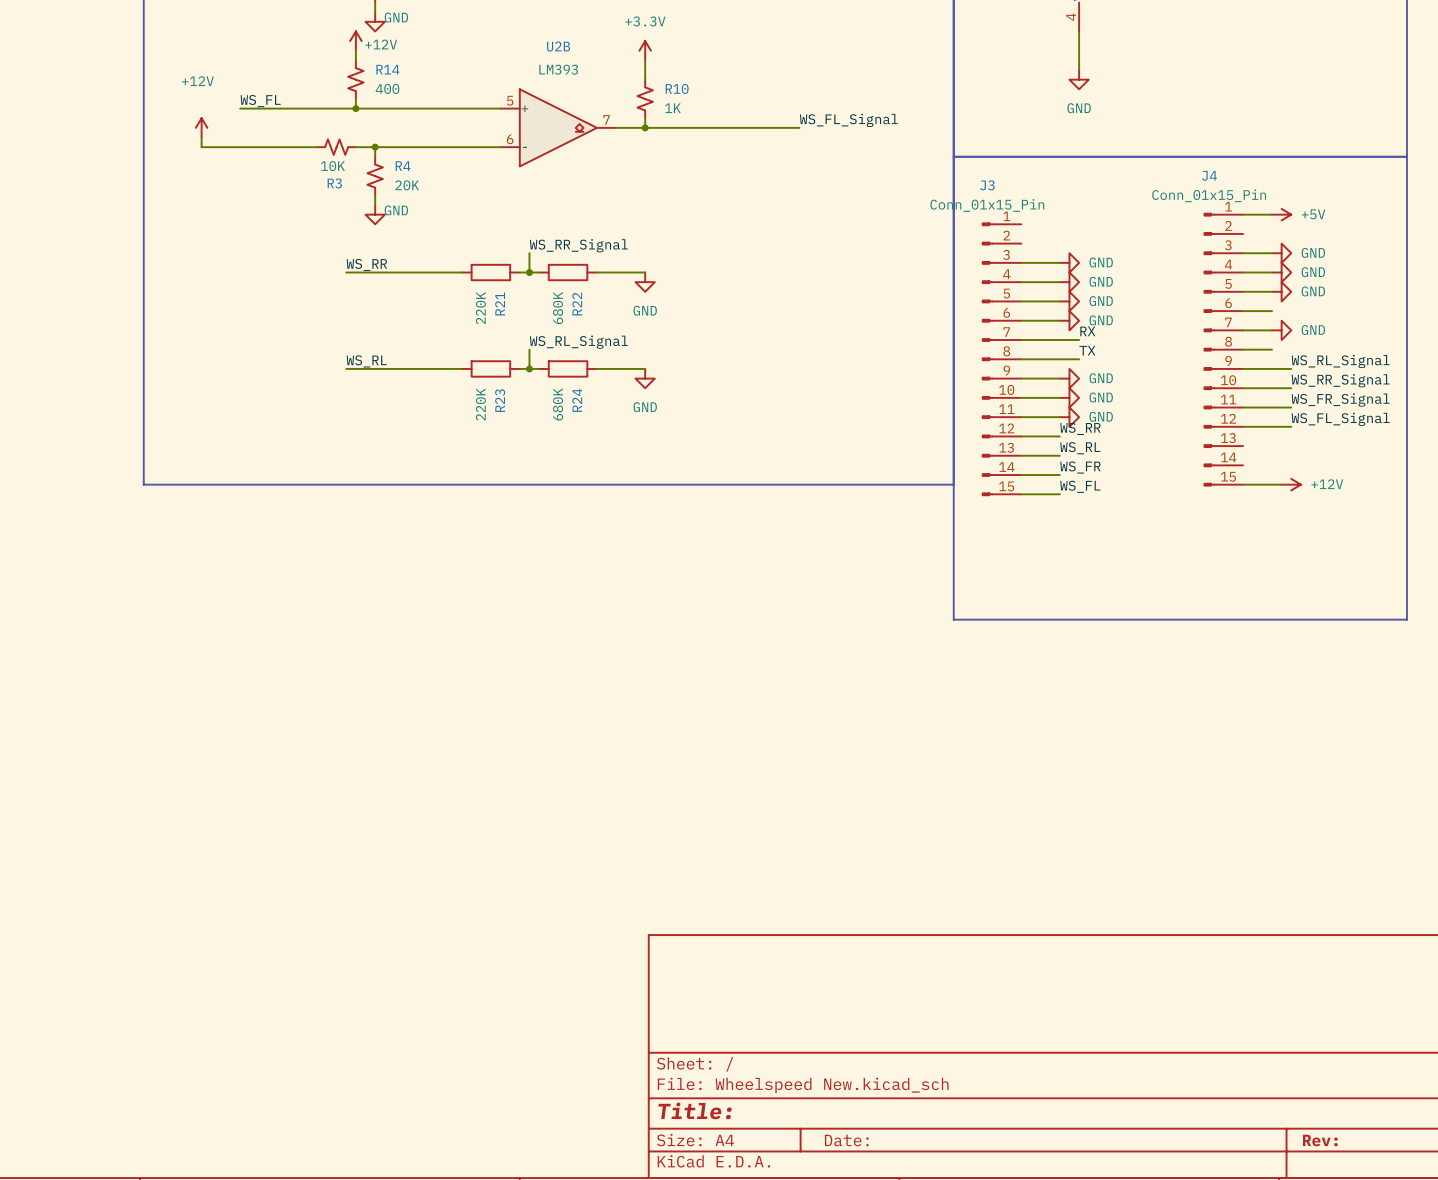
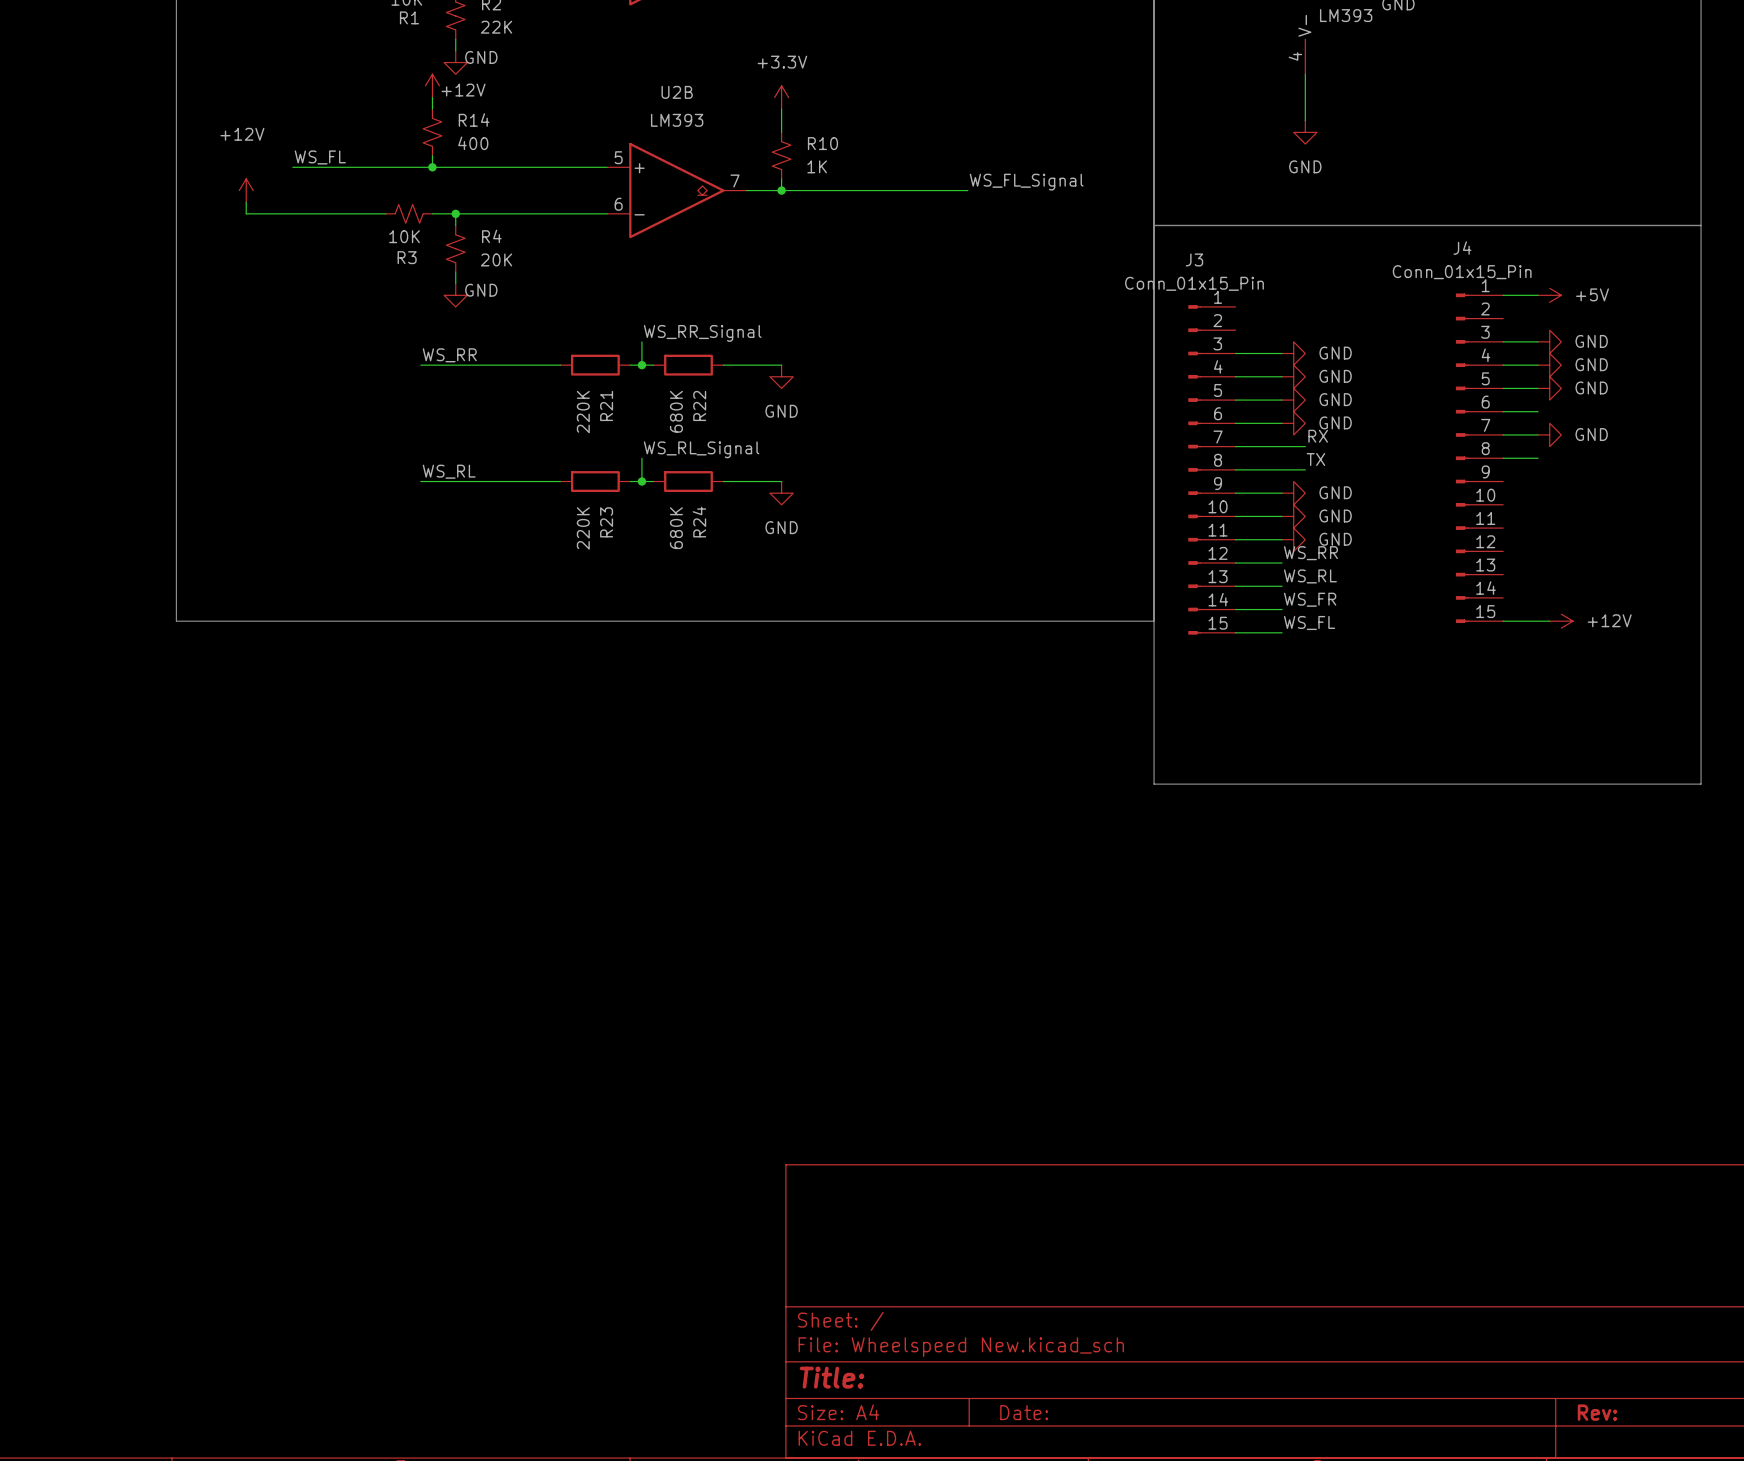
label: WS_RL_Signal (1340, 361) -> none
wire: (1243, 368) (1291, 368) -> none
label: WS_RR_Signal (1340, 380) -> none
wire: (1243, 388) (1291, 388) -> none
label: WS_FR_Signal (1340, 400) -> none
wire: (1243, 407) (1291, 407) -> none
label: WS_FL_Signal (1340, 419) -> none
wire: (1243, 426) (1291, 426) -> none

